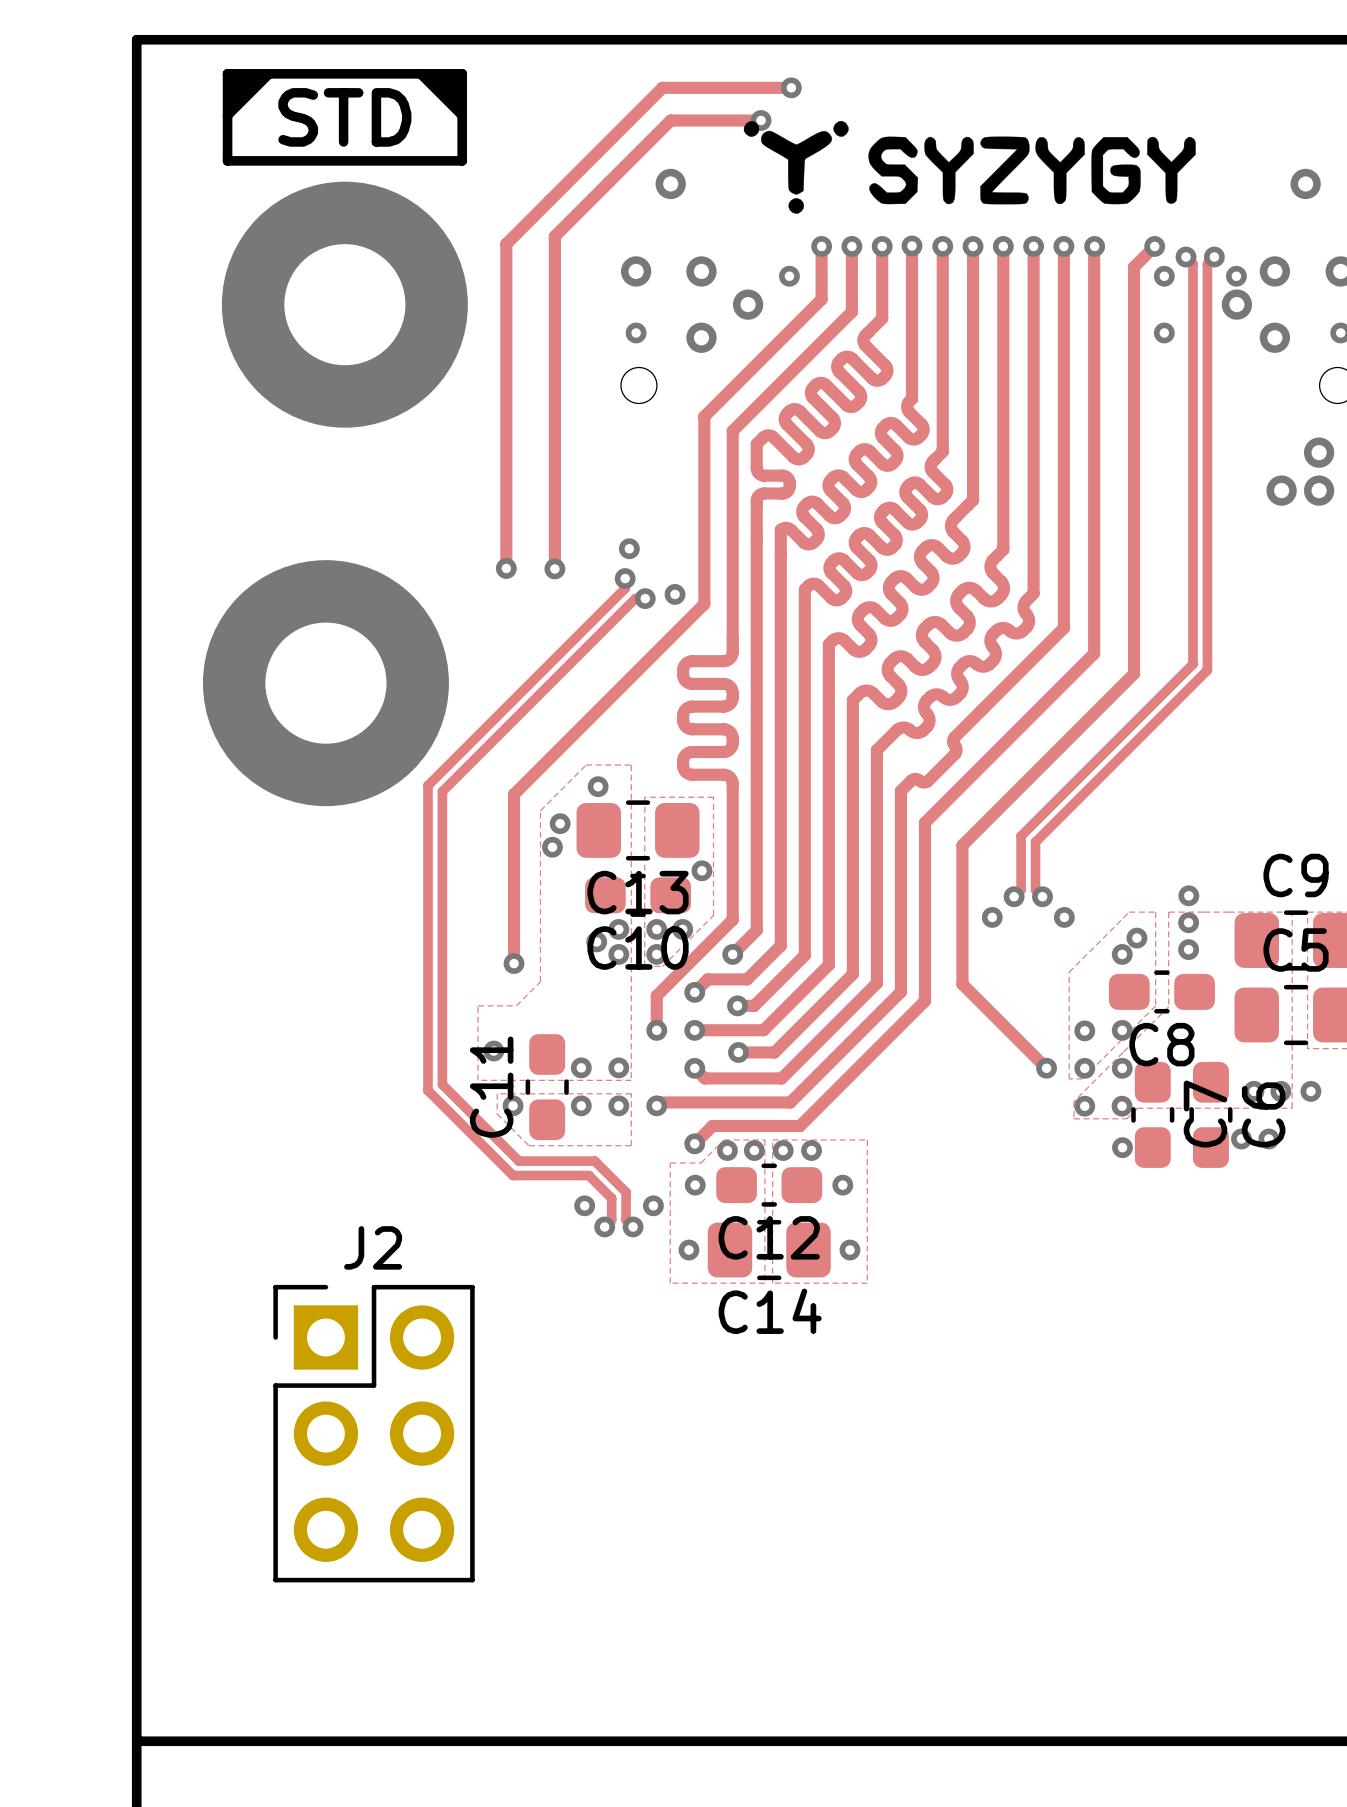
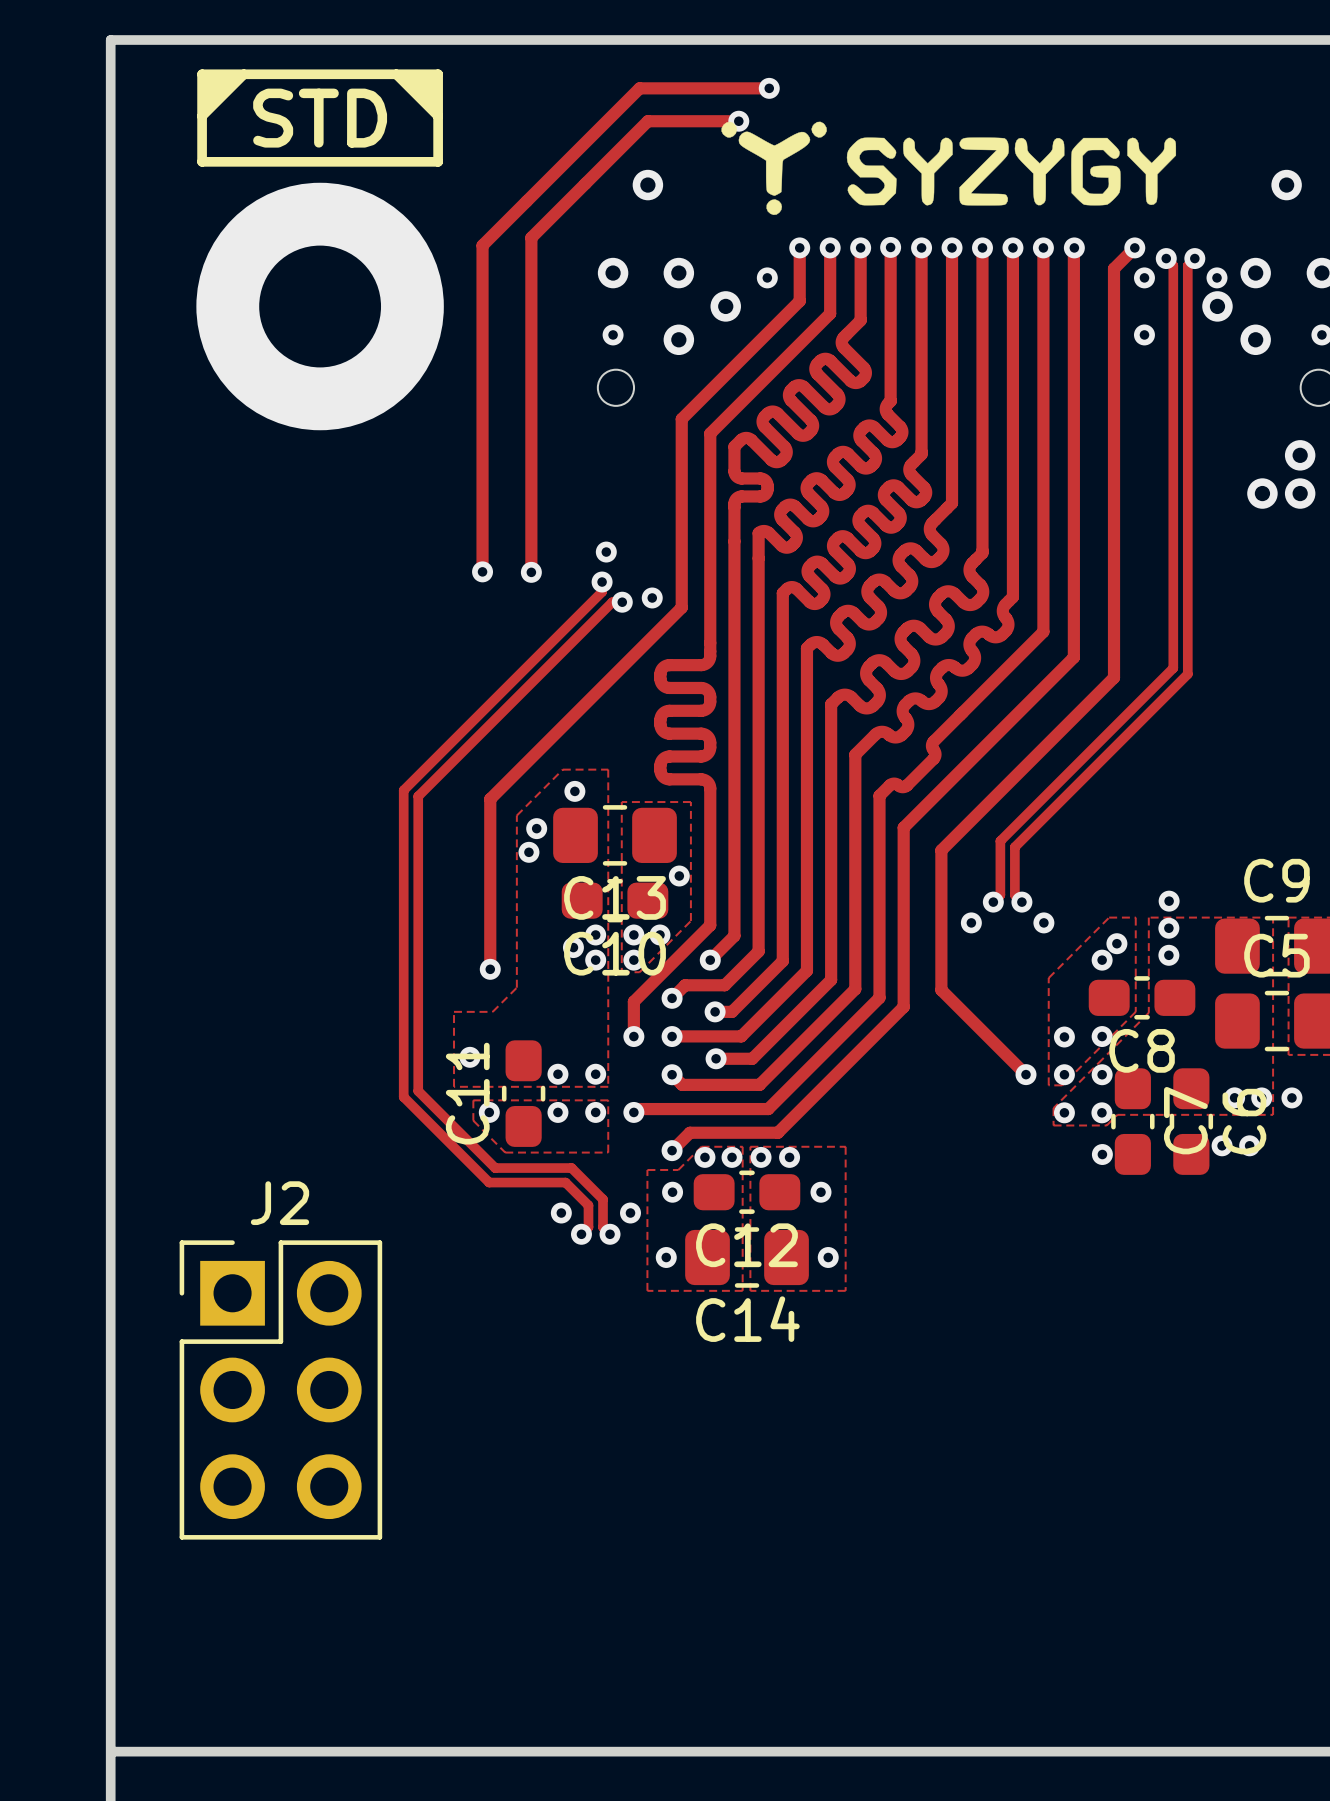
via: (325, 683) -> none
J2 position: (374, 1433) -> (280, 1389)

